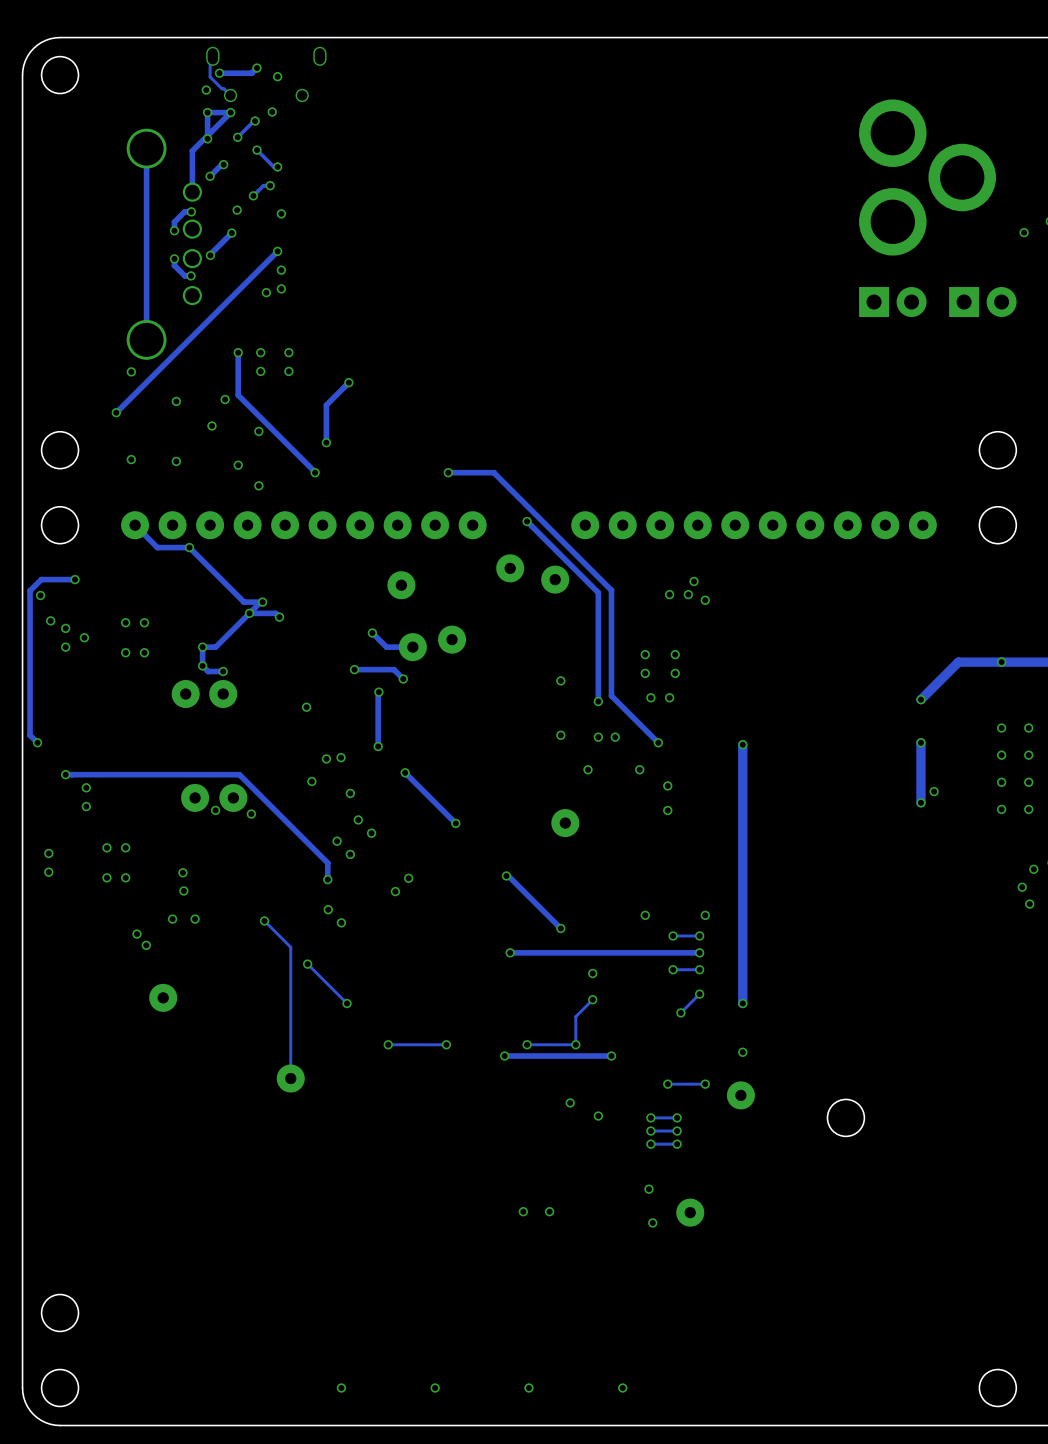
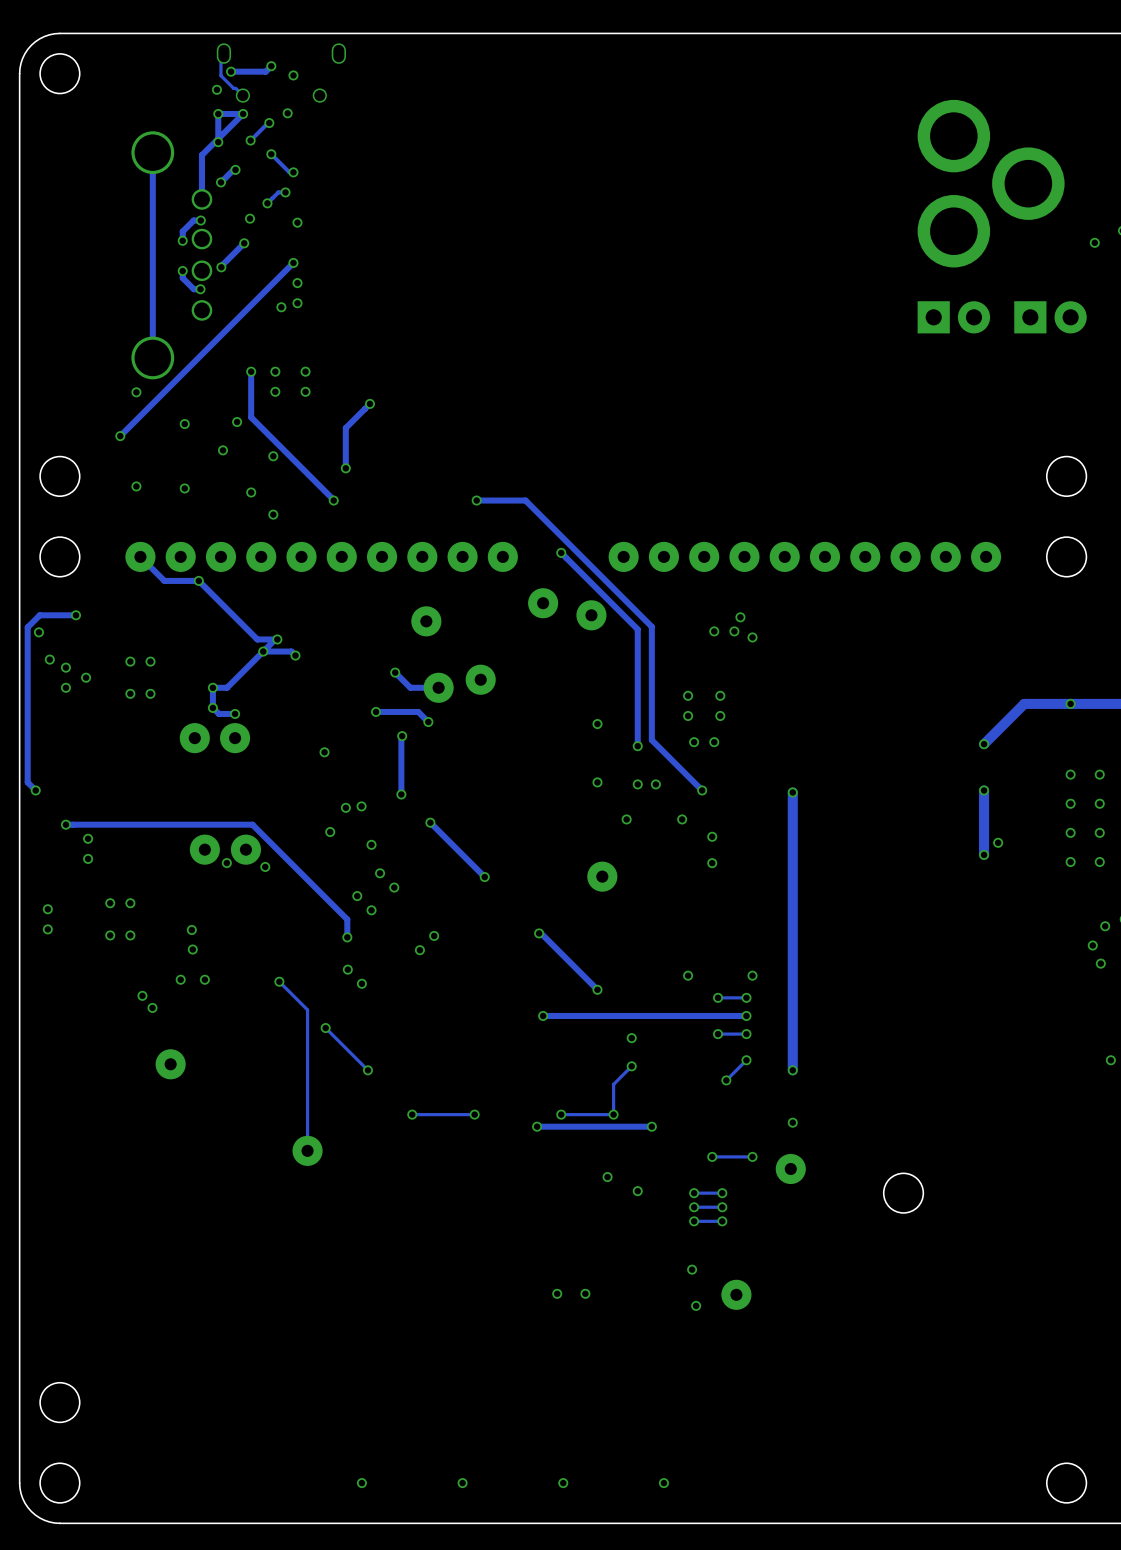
via: none -> (1110, 1060)

